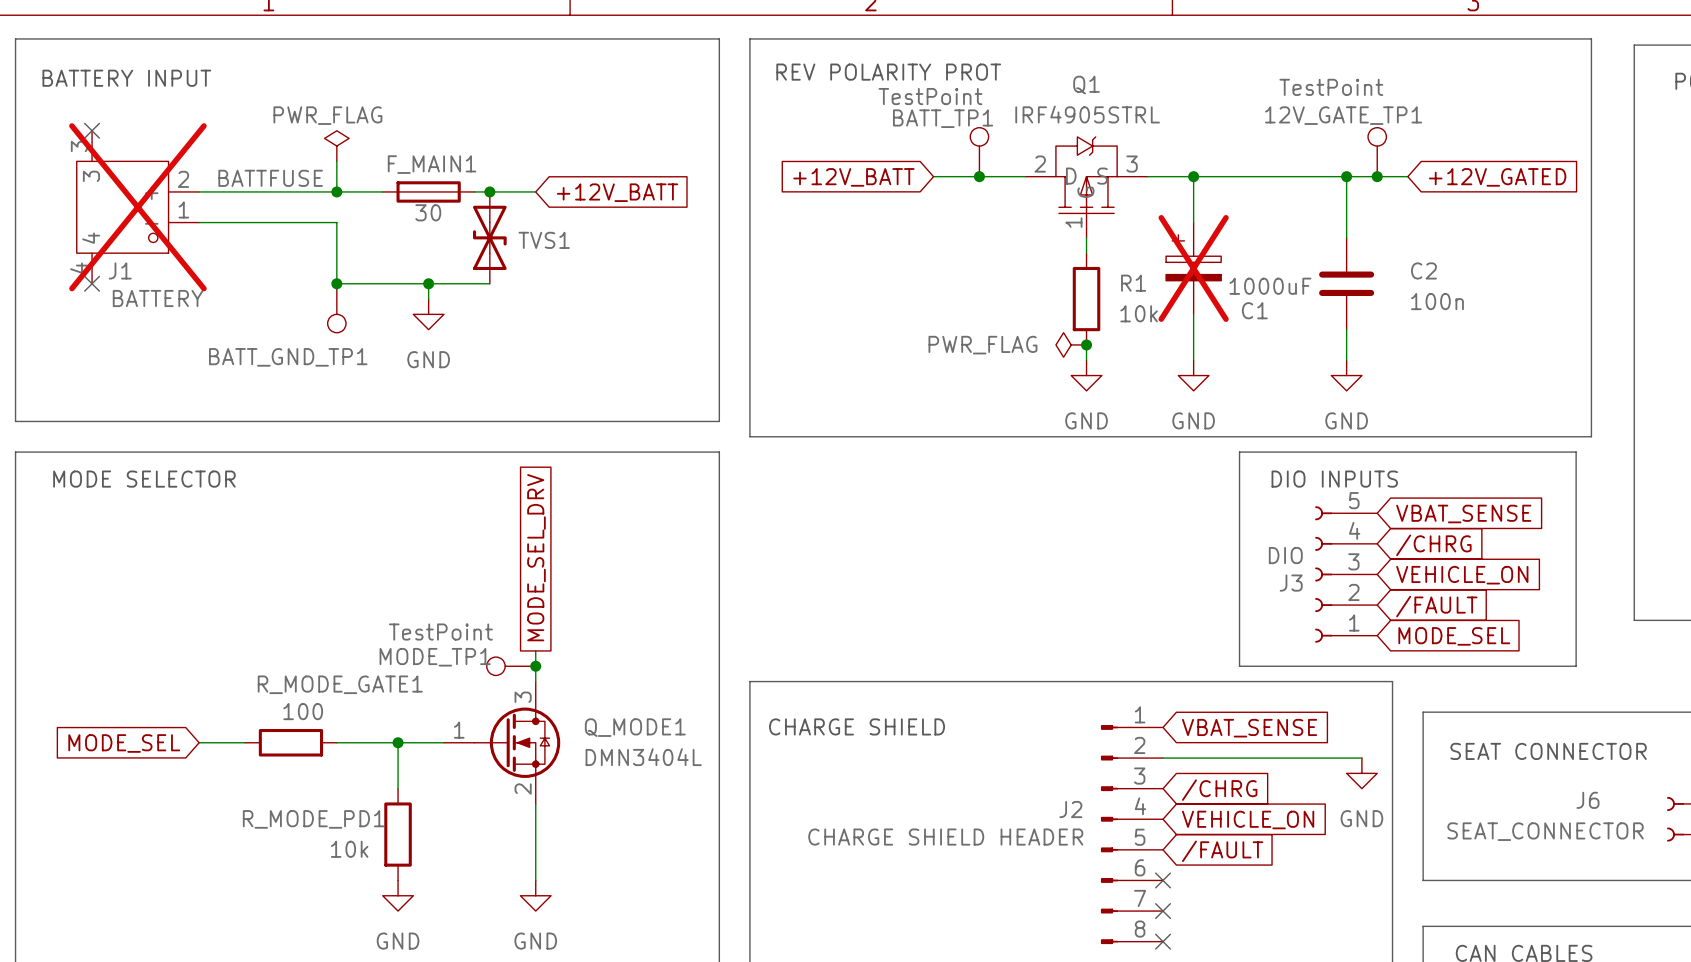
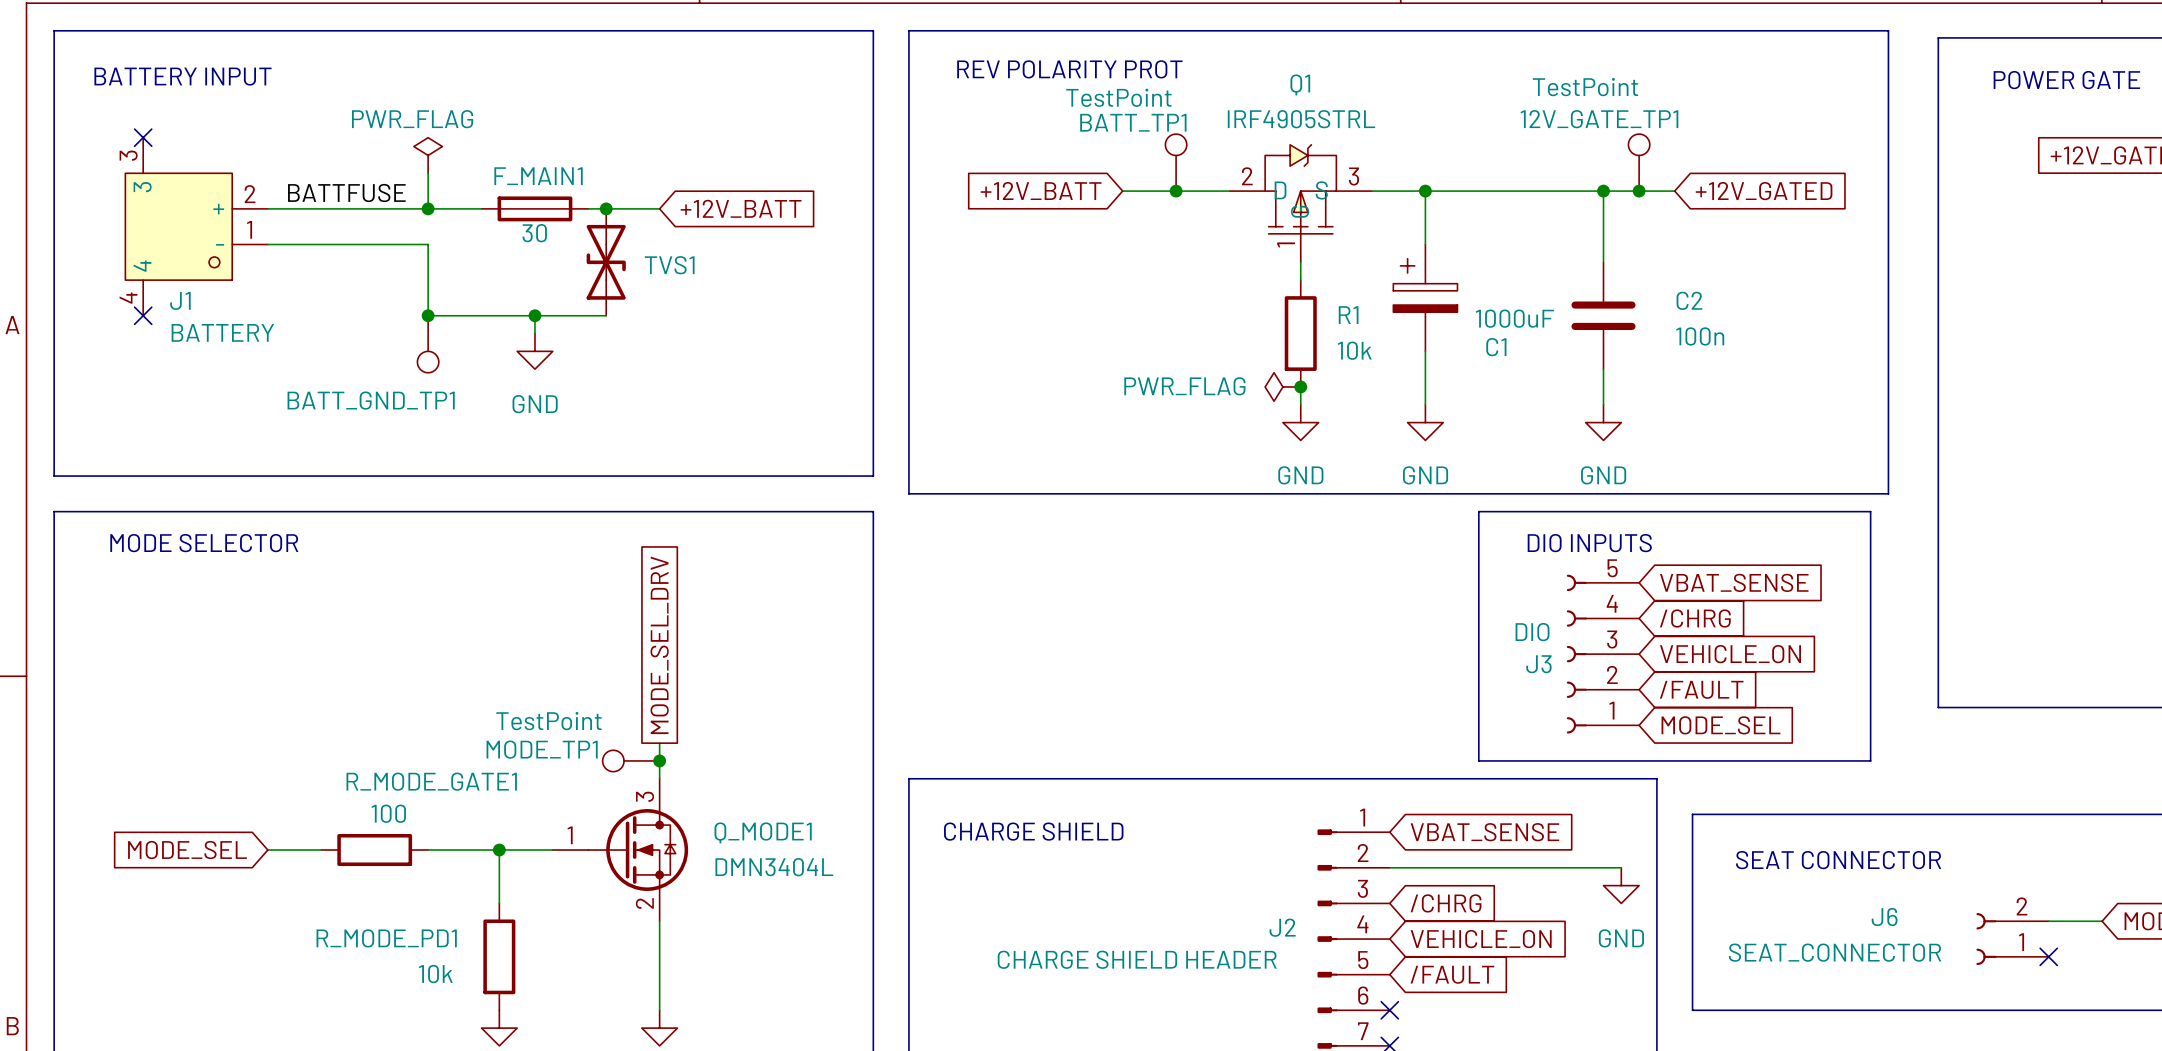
J1 do-not-place cross: (137, 207) -> none
C1 do-not-place cross: (1193, 268) -> none

